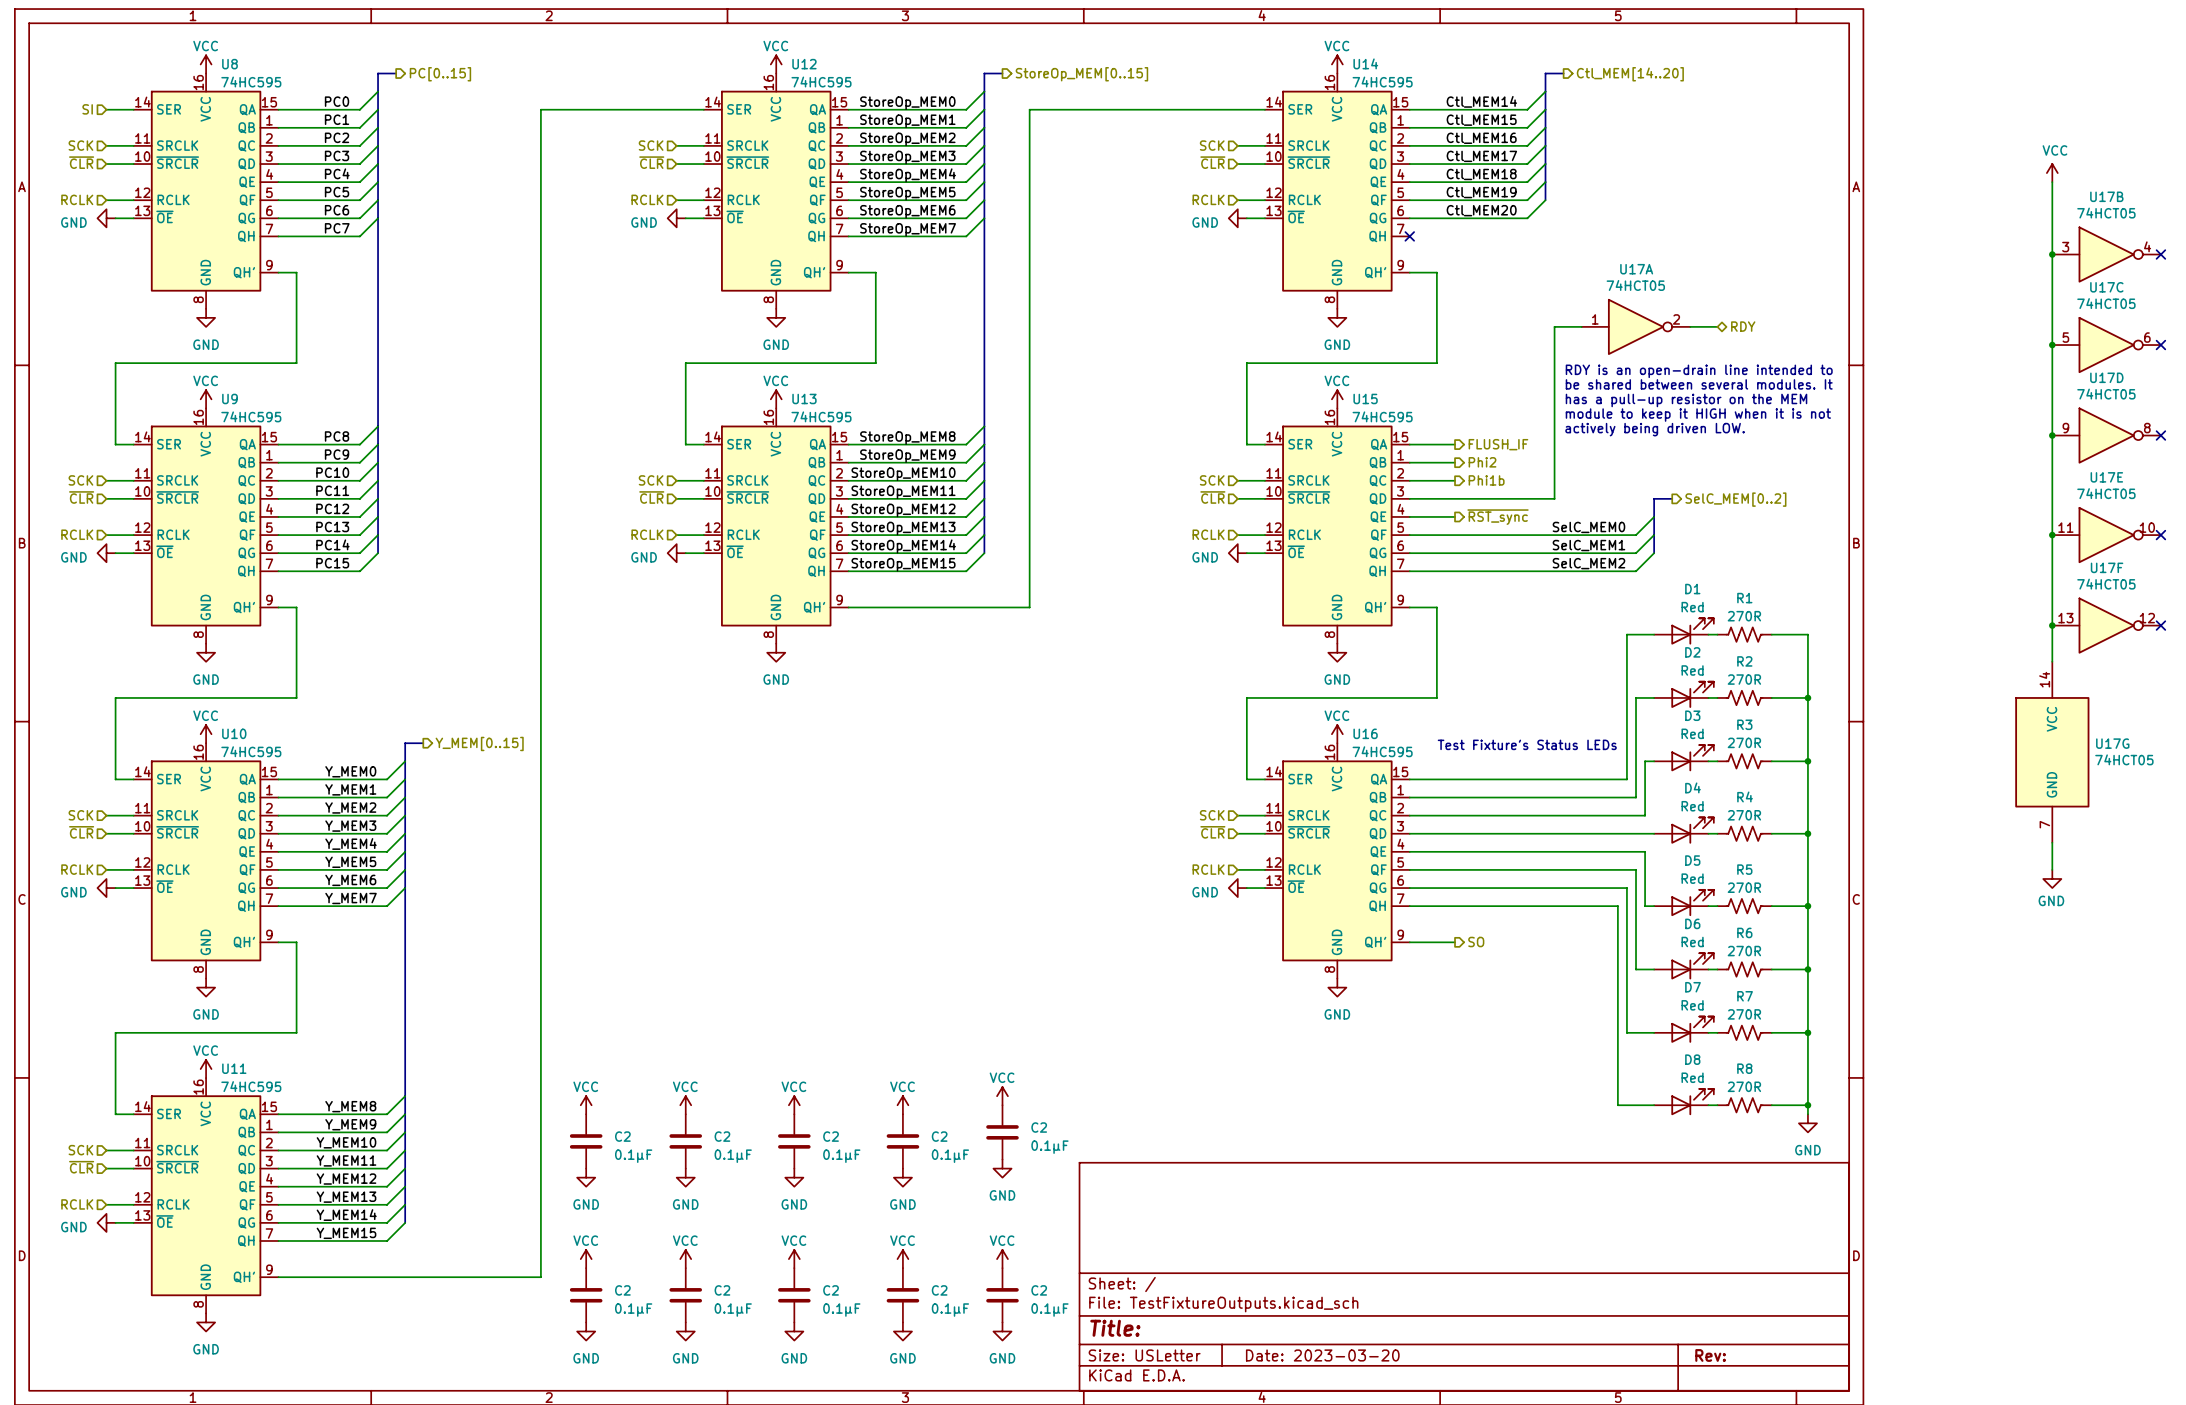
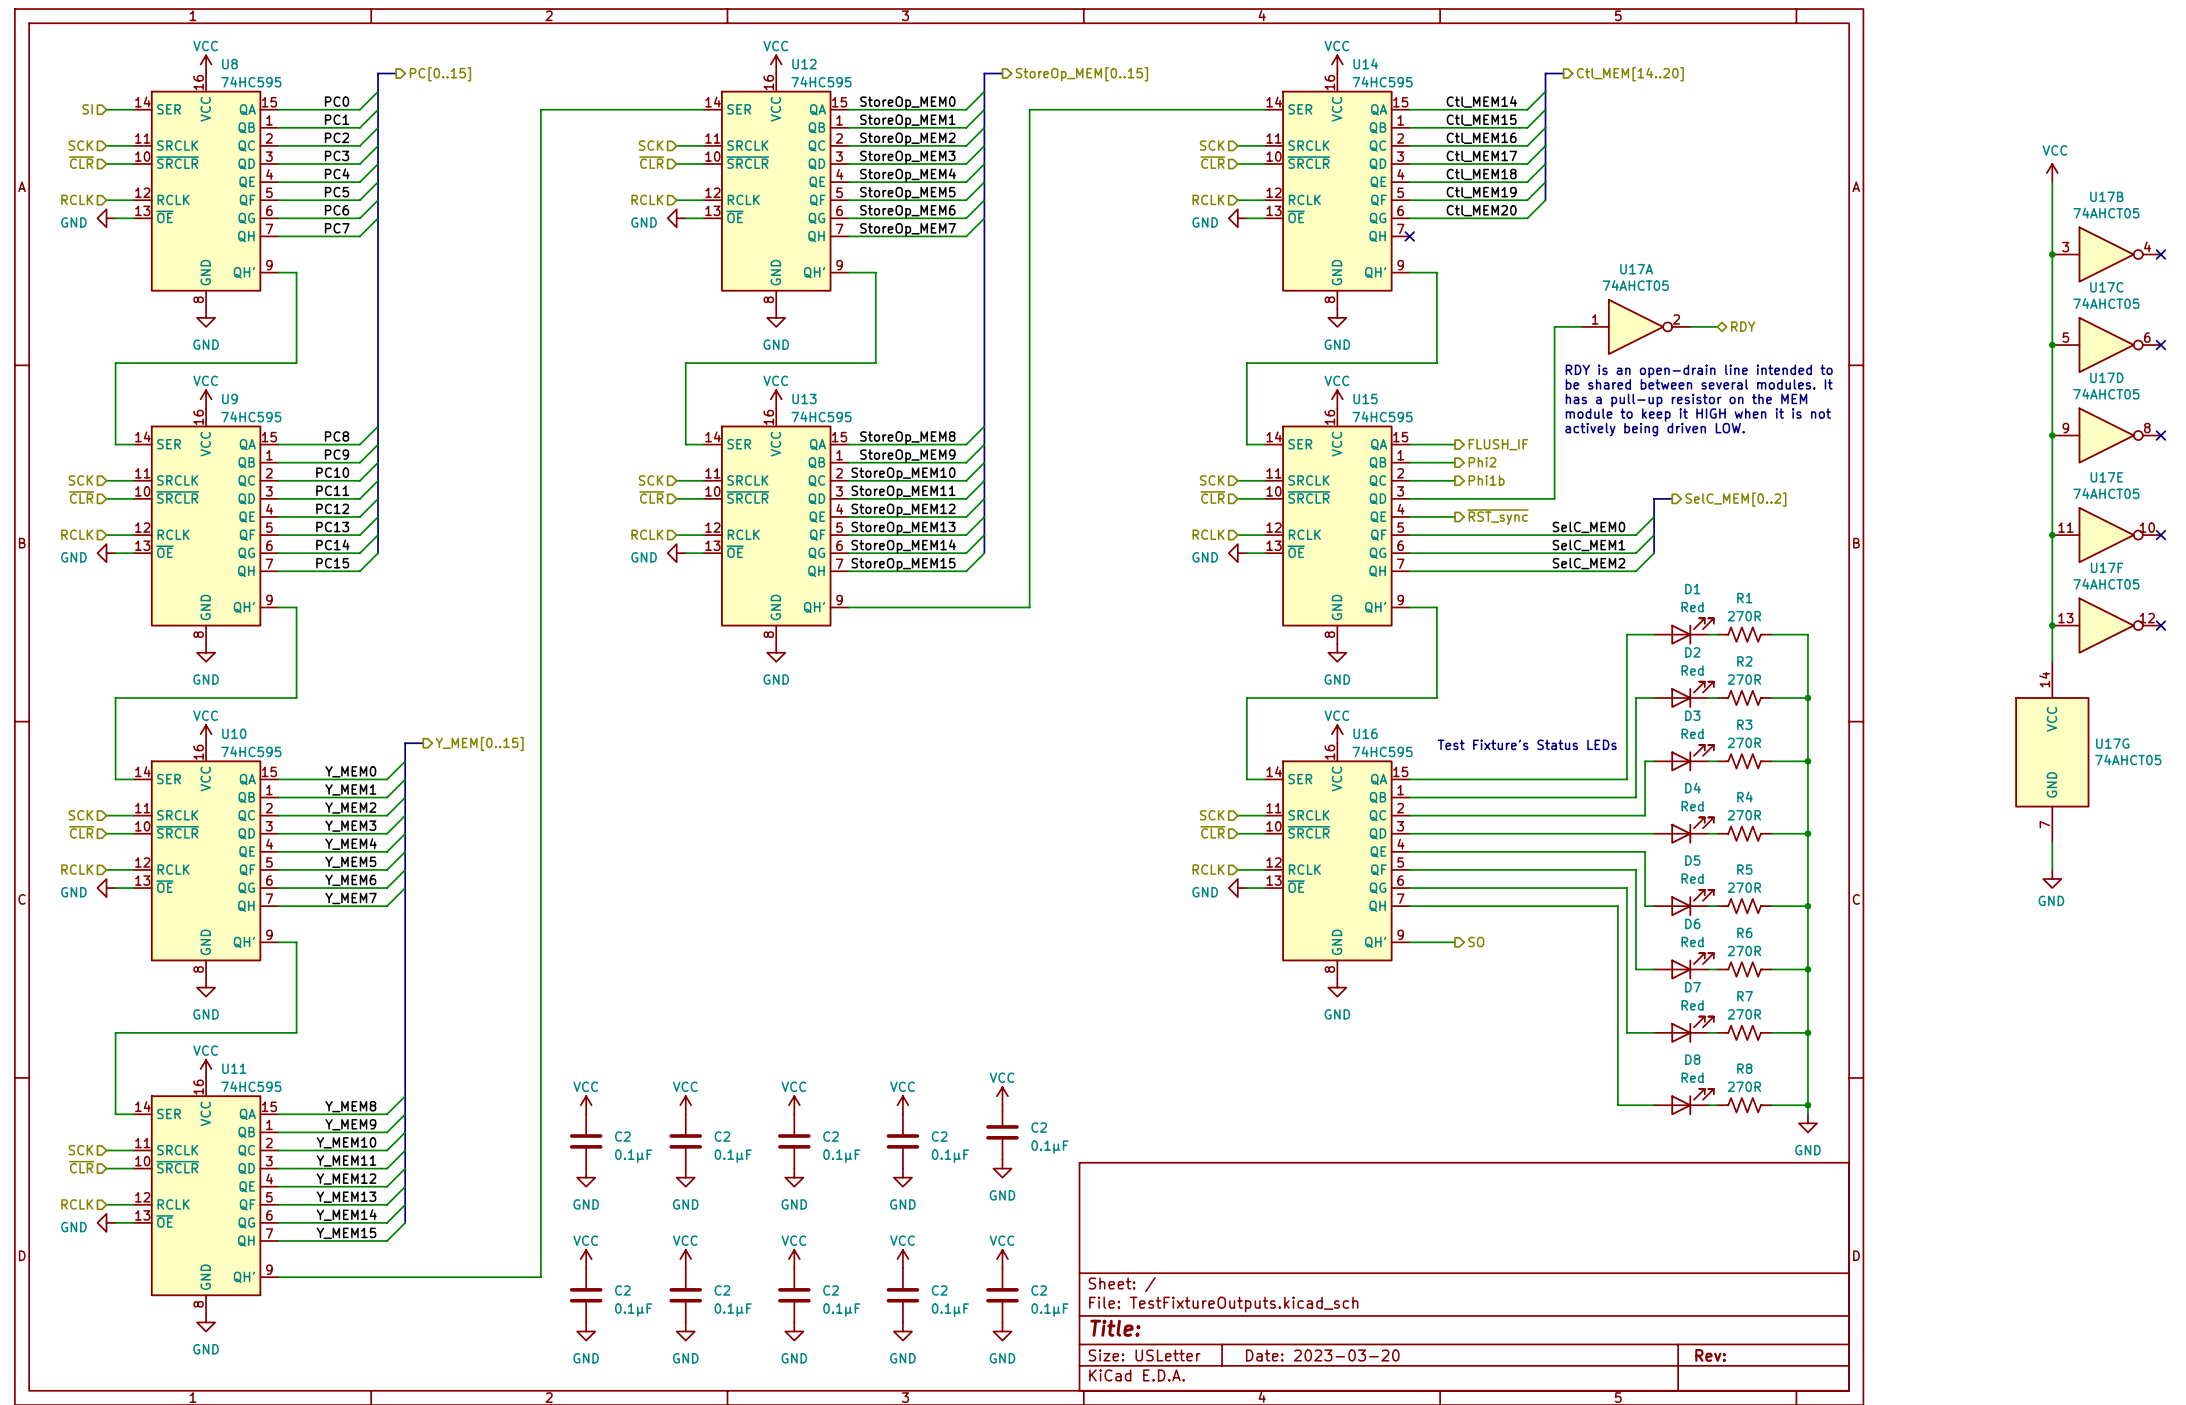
U17B value: 74HCT05 (2106, 213) -> 74AHCT05 (2106, 213)
U17A value: 74HCT05 (1635, 285) -> 74AHCT05 (1635, 285)
U17C value: 74HCT05 (2106, 303) -> 74AHCT05 (2106, 303)
U17D value: 74HCT05 (2106, 394) -> 74AHCT05 (2106, 394)
U17E value: 74HCT05 (2106, 493) -> 74AHCT05 (2106, 493)
U17F value: 74HCT05 (2106, 584) -> 74AHCT05 (2106, 584)
U17G value: 74HCT05 (2124, 759) -> 74AHCT05 (2128, 759)

